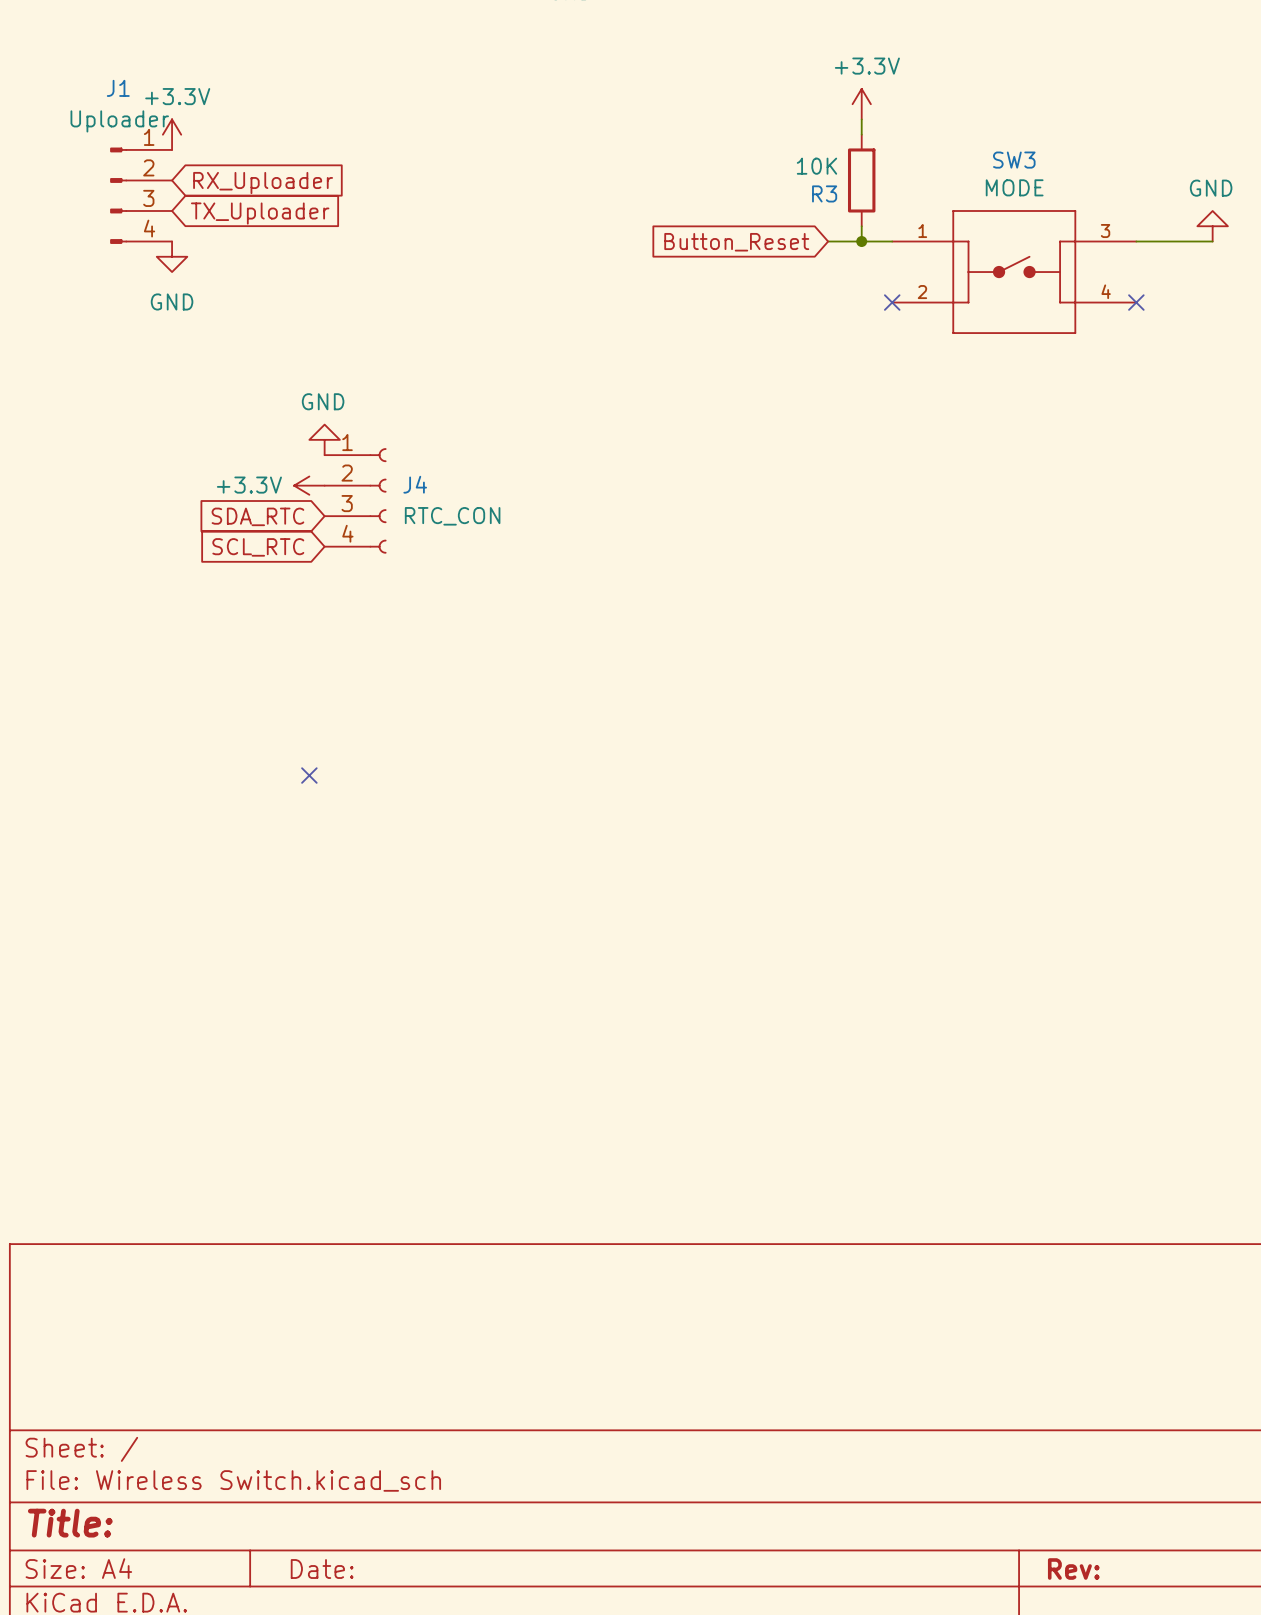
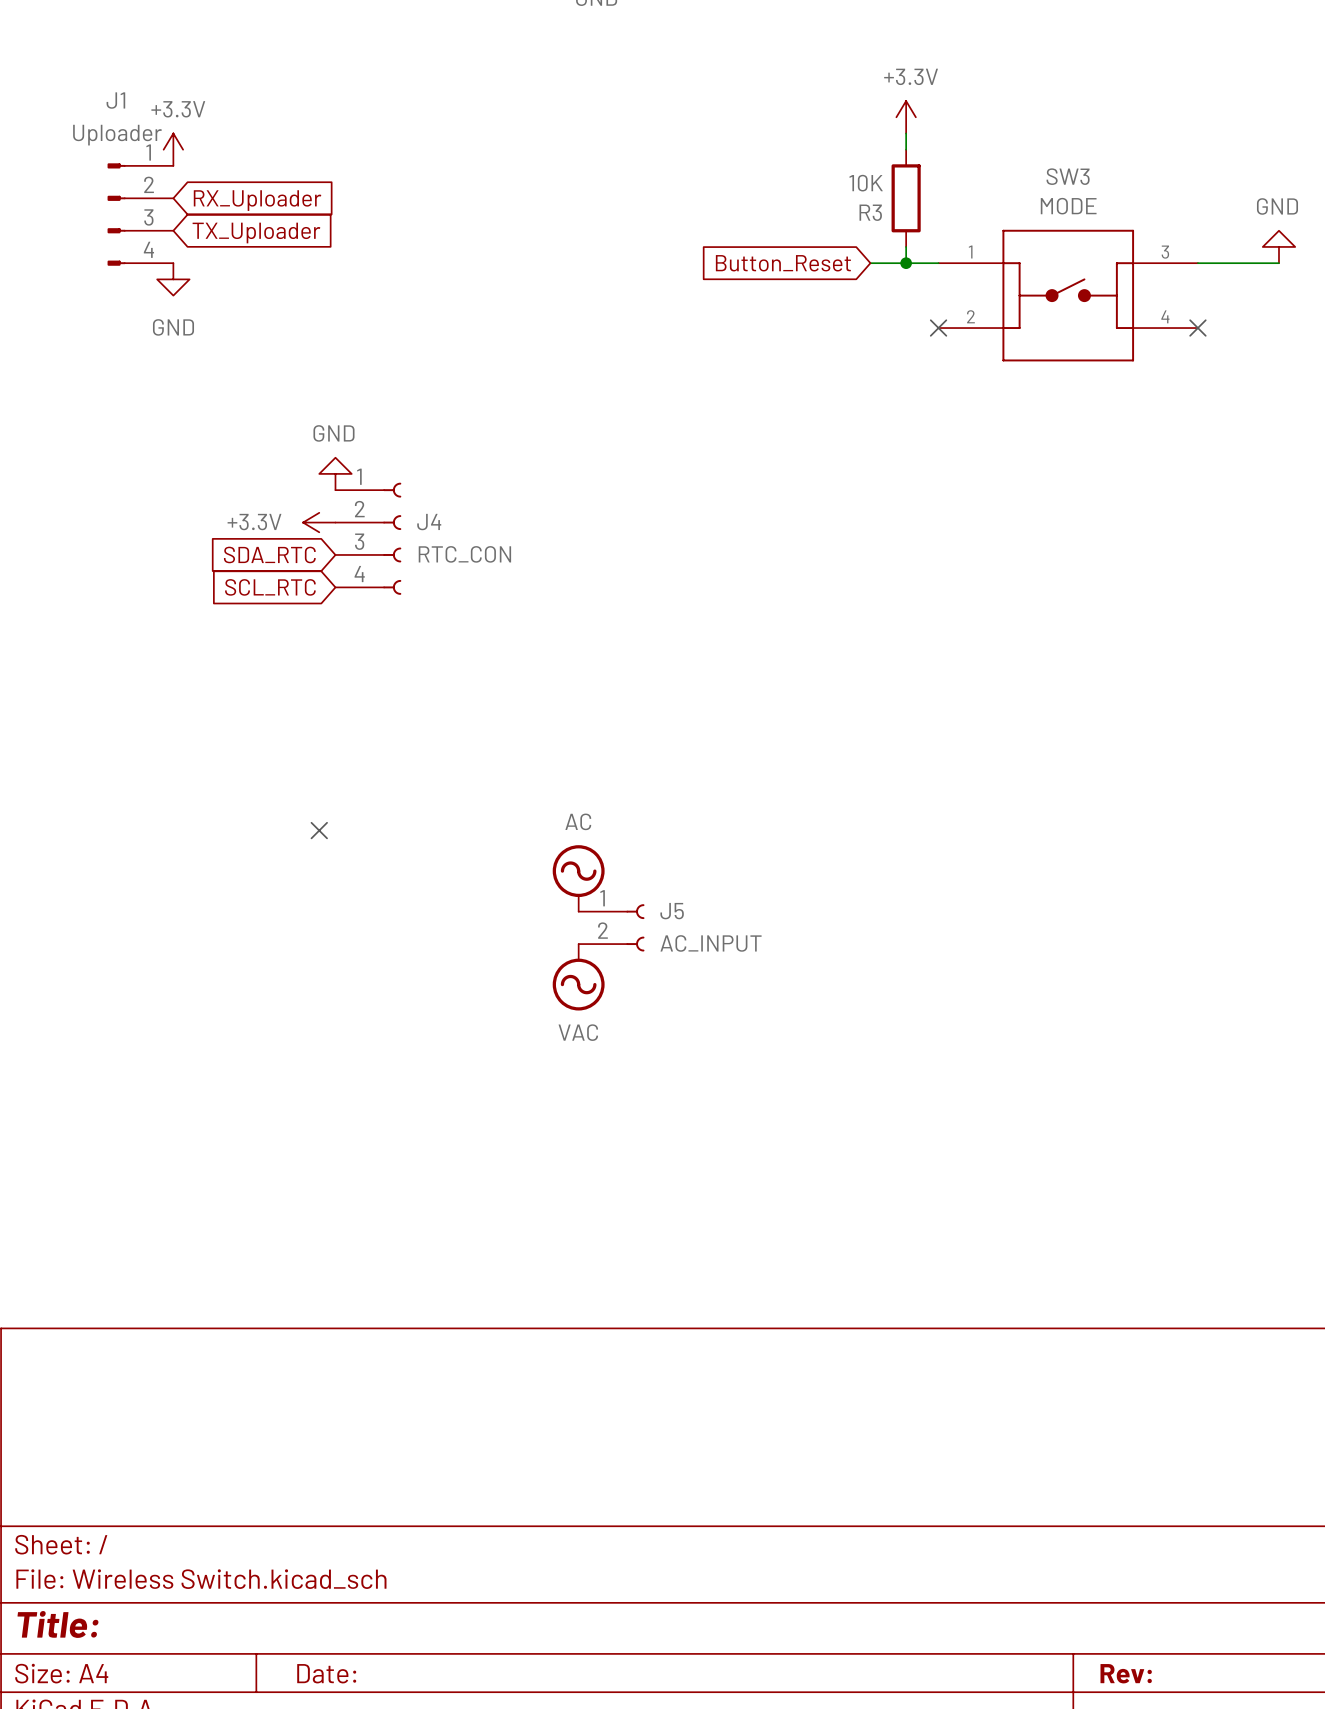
power symbol: none -> AC (578, 878)
J5: none -> AC_INPUT (611, 927)
power symbol: none -> VAC (578, 977)

